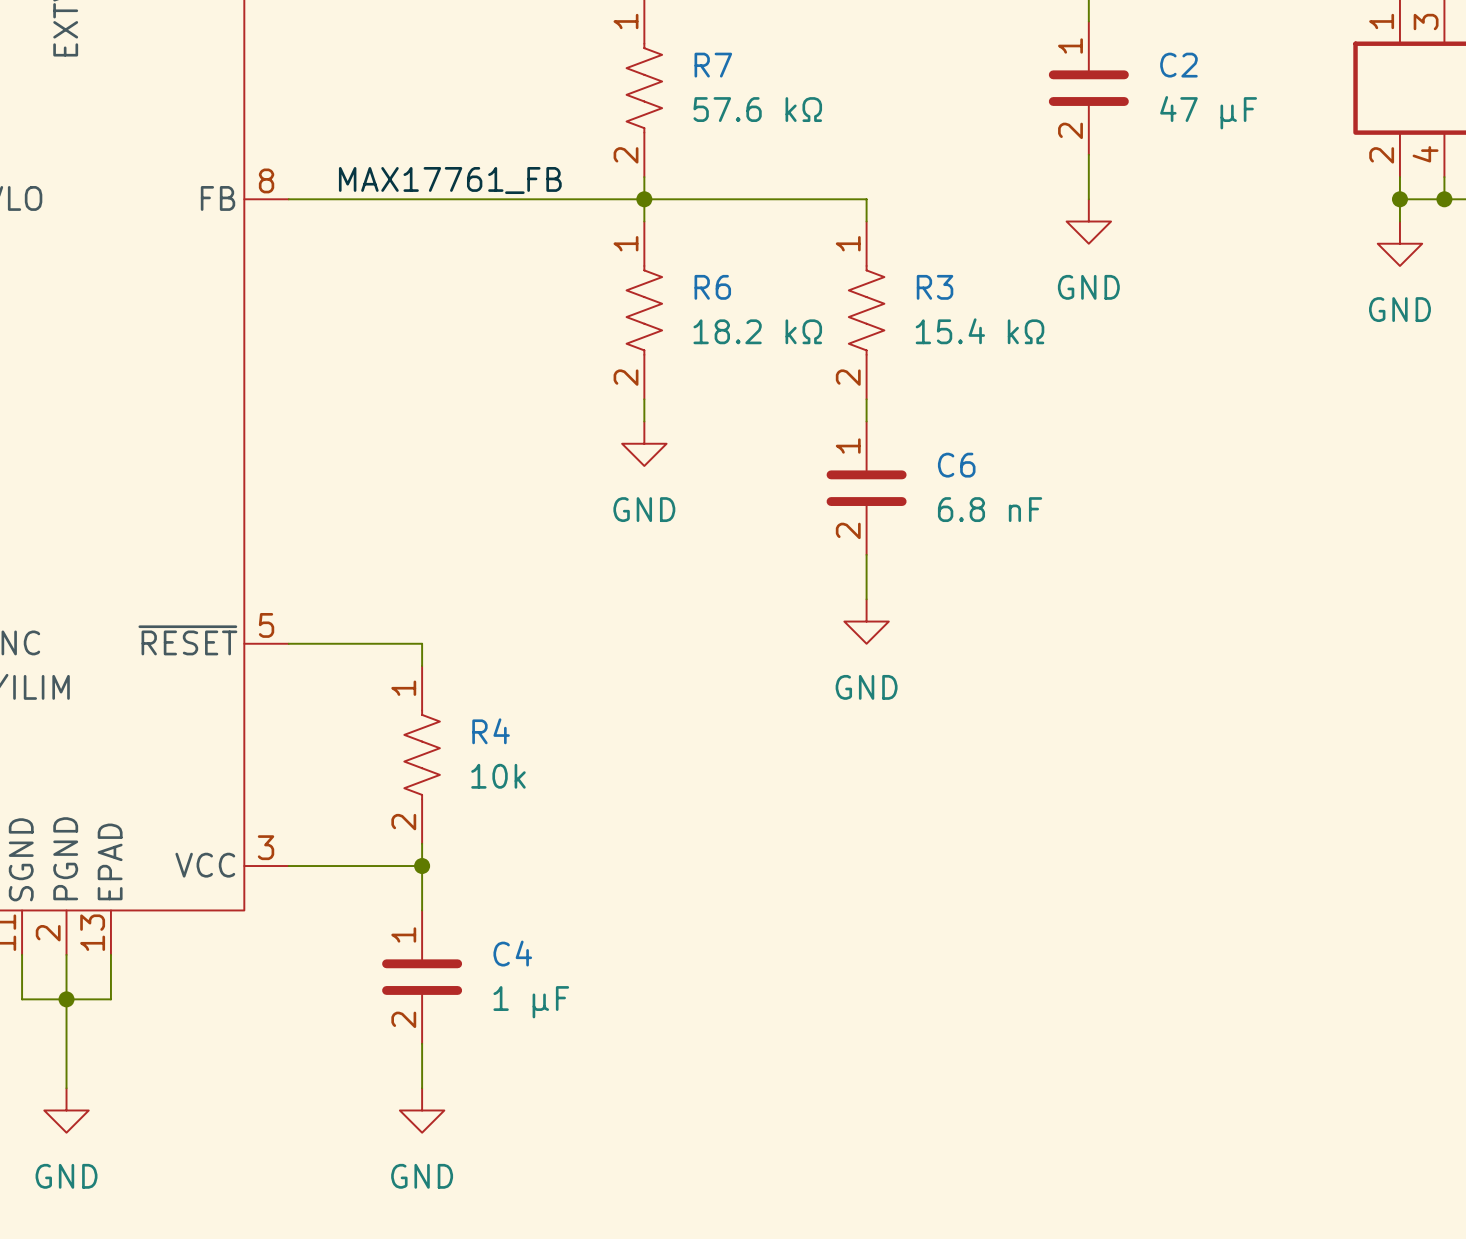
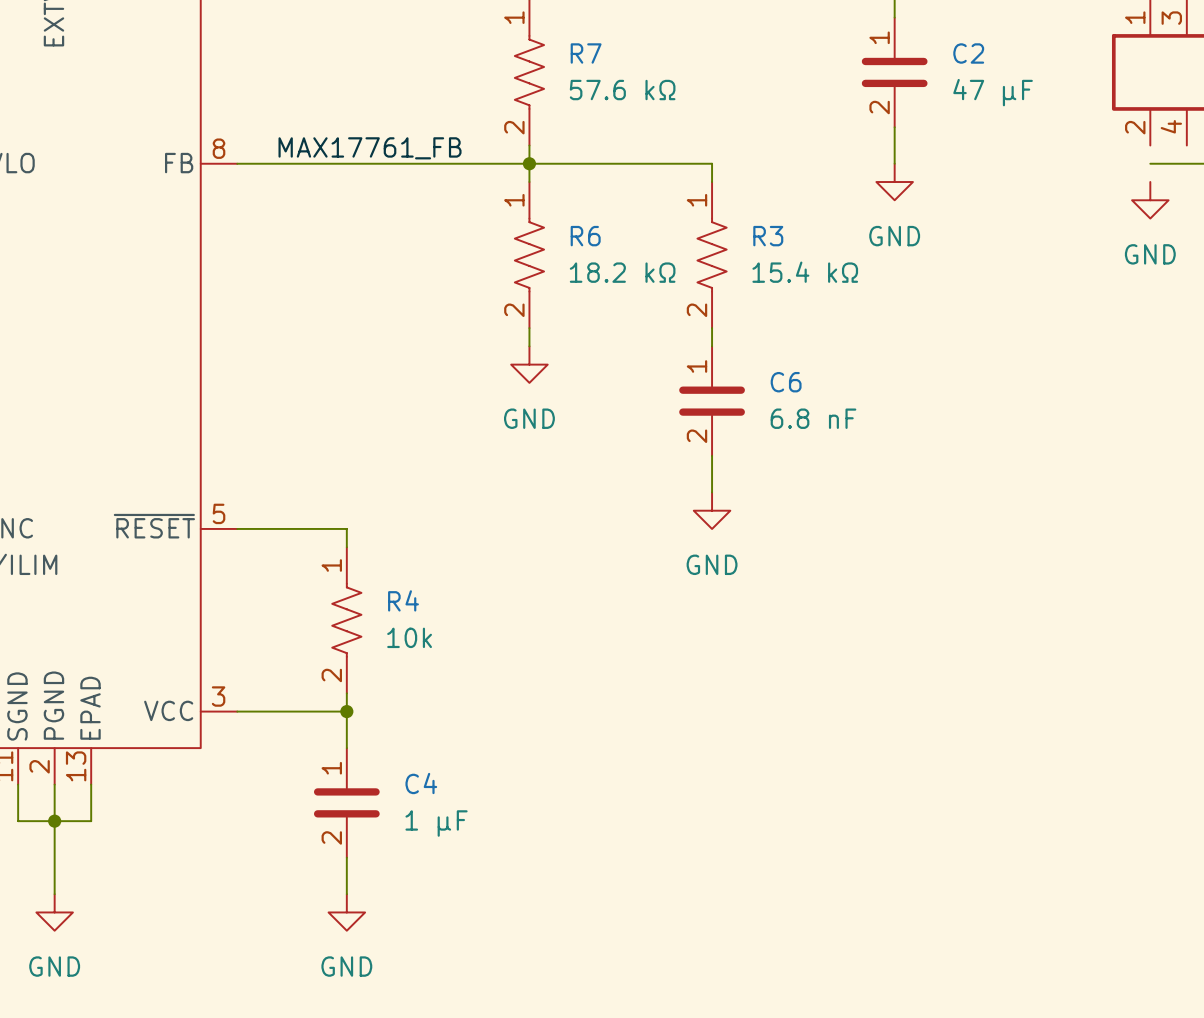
wire: (1399, 177) (1399, 221) -> none
wire: (1444, 177) (1444, 199) -> none
junction: (1399, 199) -> none
junction: (1444, 199) -> none

